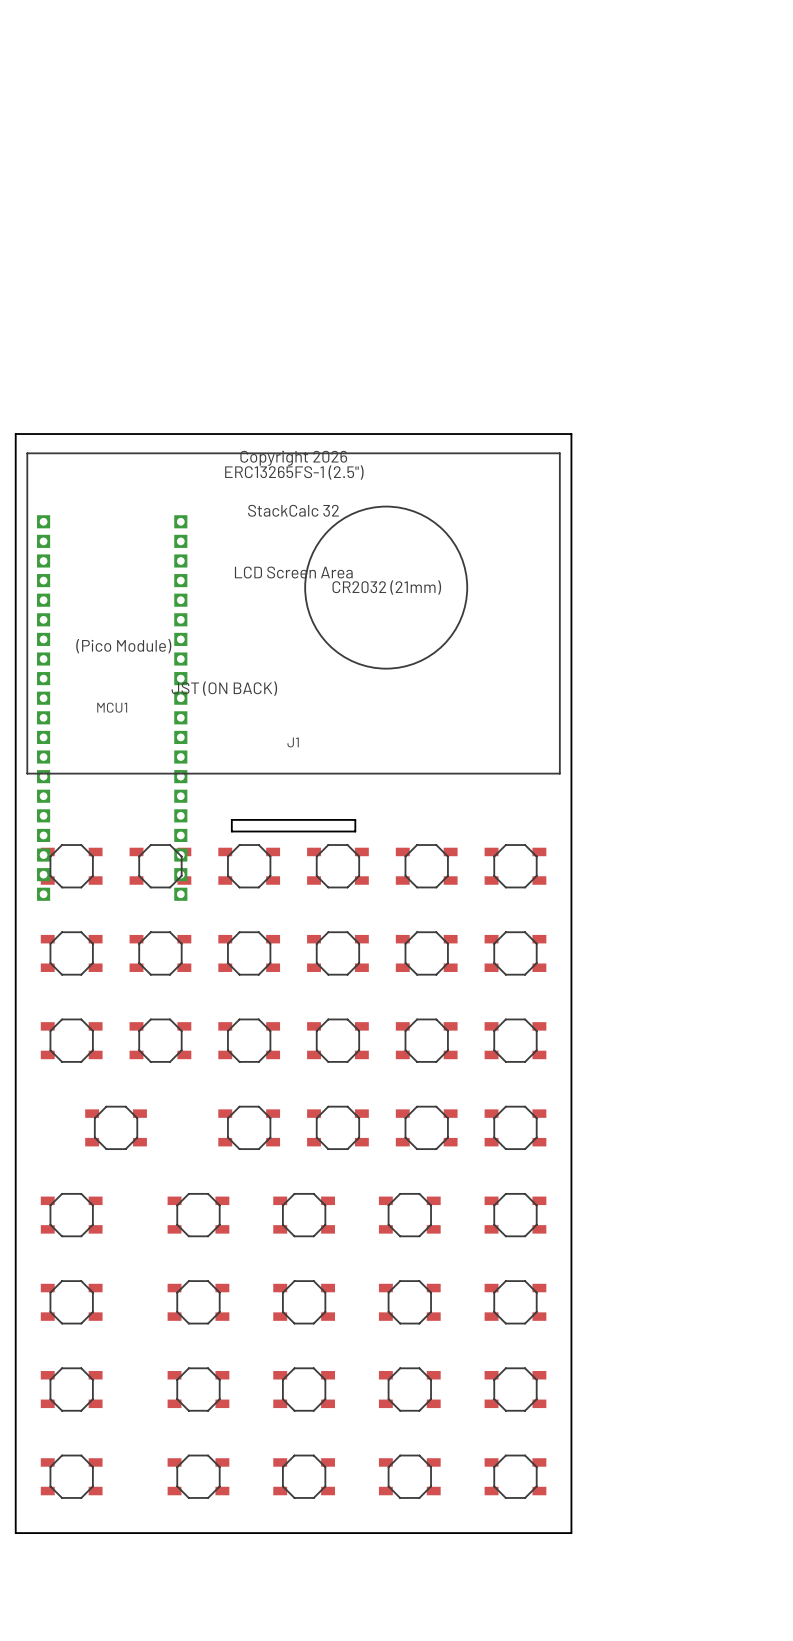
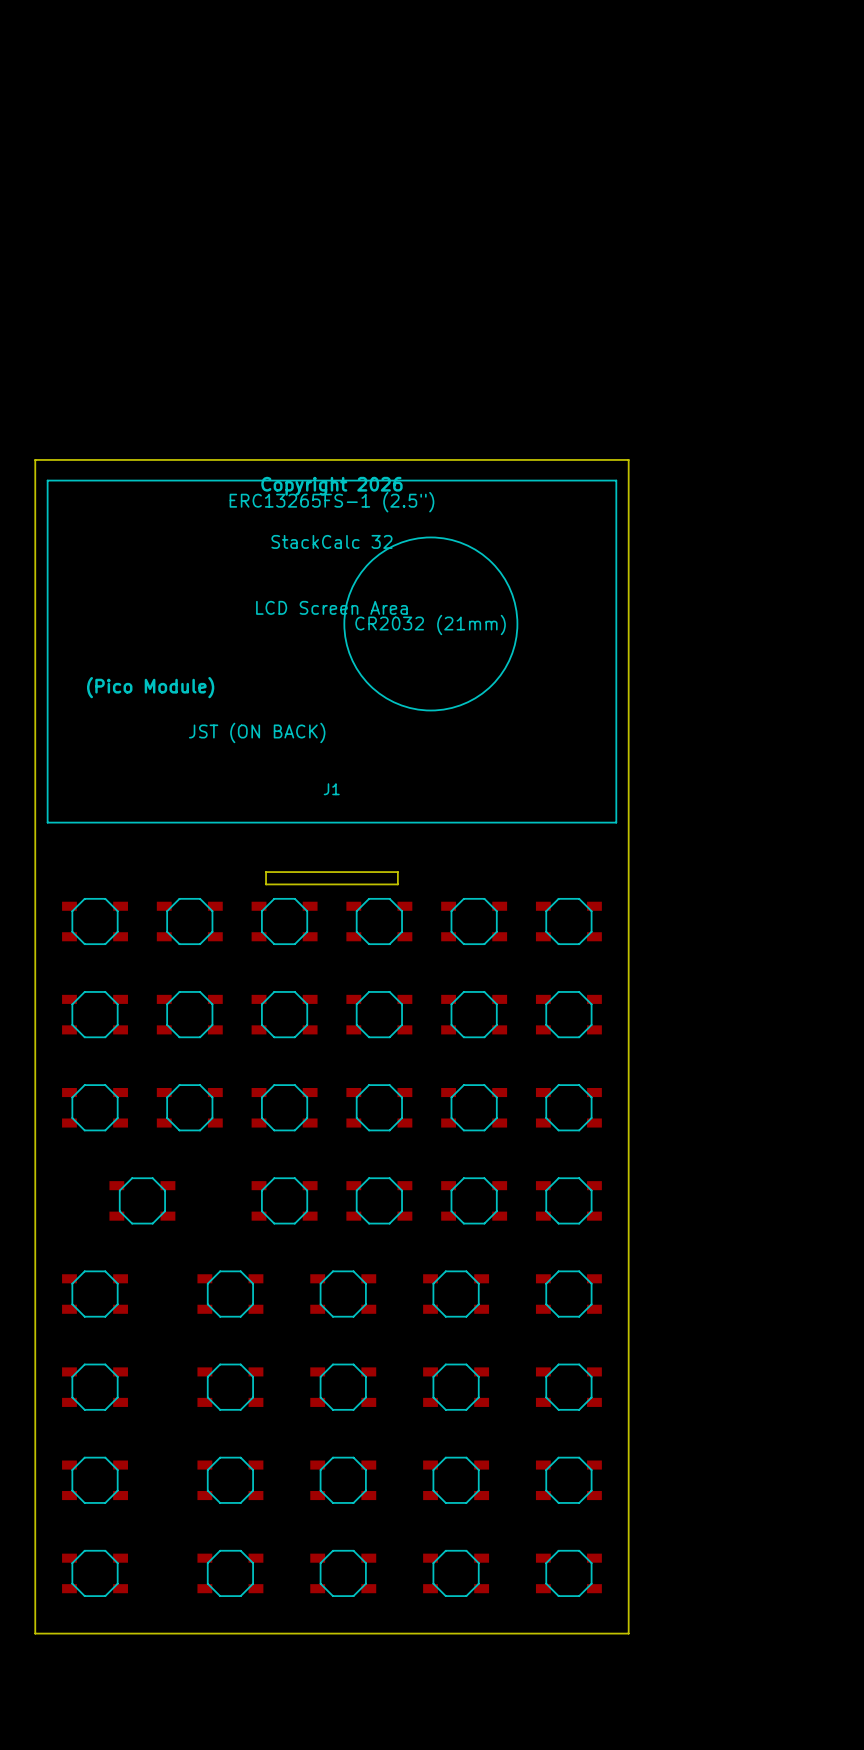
MCU1: (112, 708) -> none

